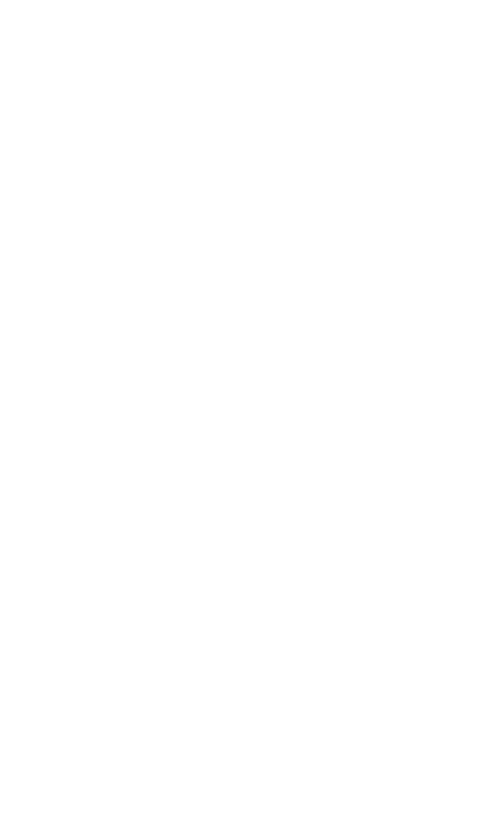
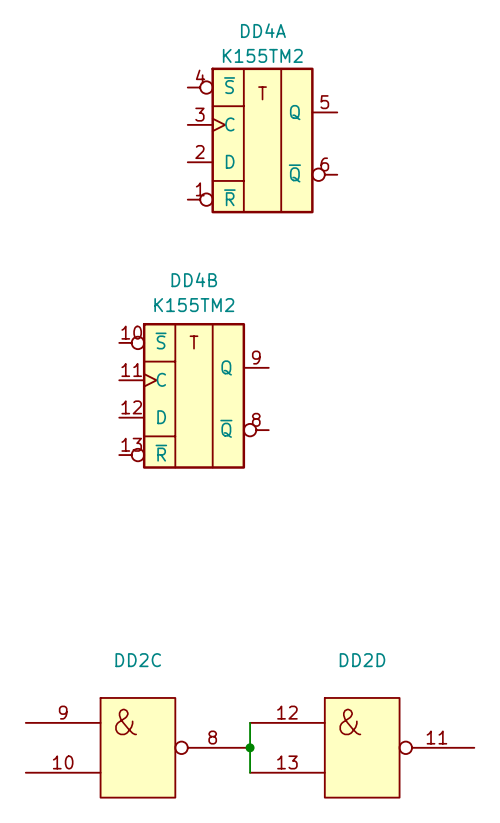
DD4A: none -> К155ТМ2 (262, 140)
DD4B: none -> К155ТМ2 (194, 395)
wire: none -> (250, 722) (250, 772)
DD2C: none -> (137, 747)
junction: none -> (250, 747)
DD2D: none -> (362, 747)

